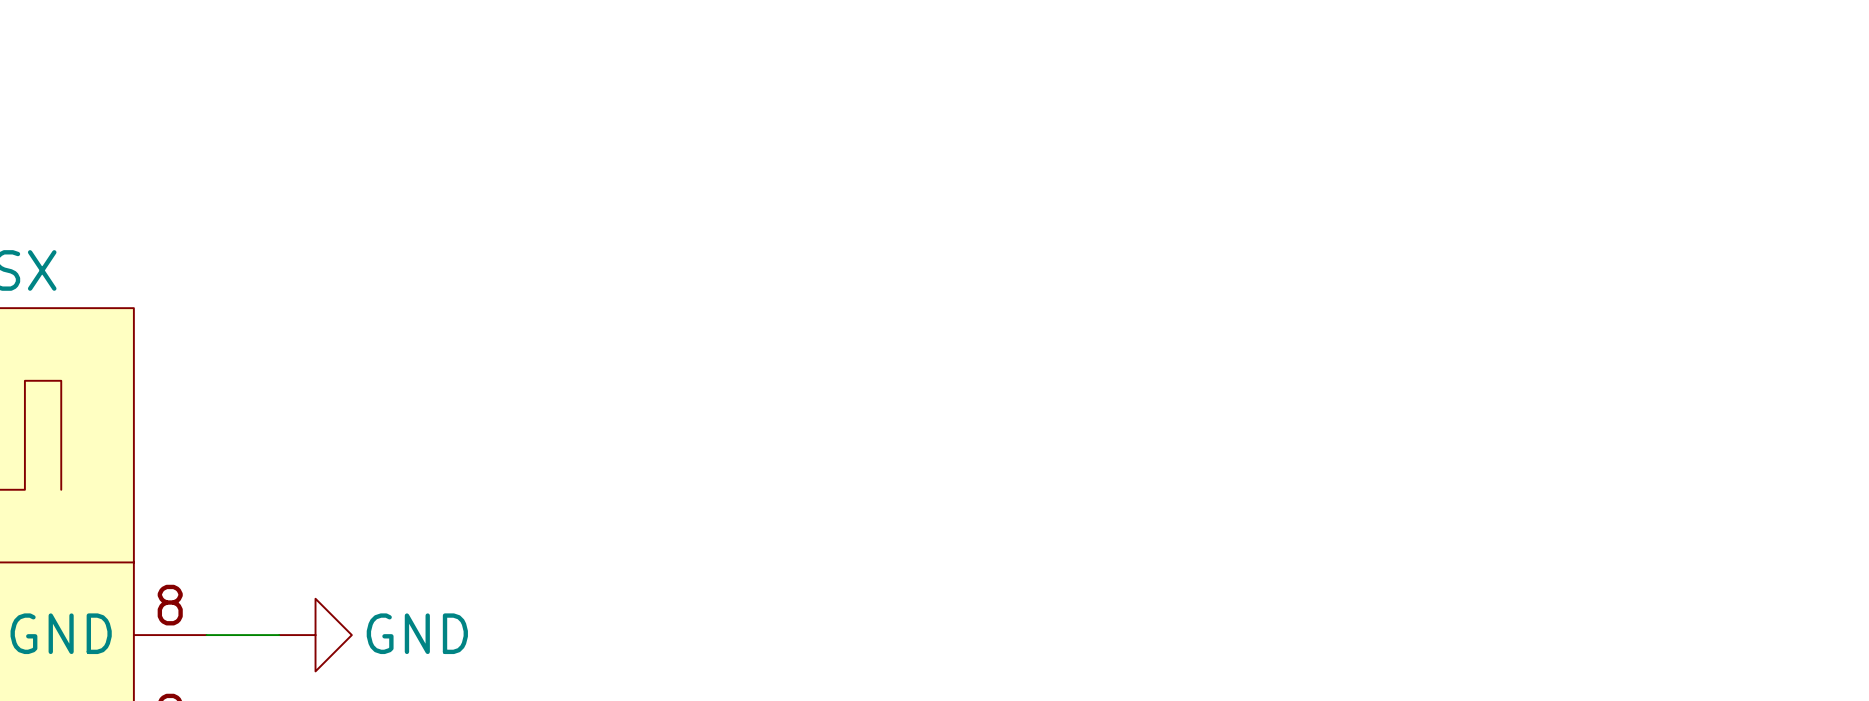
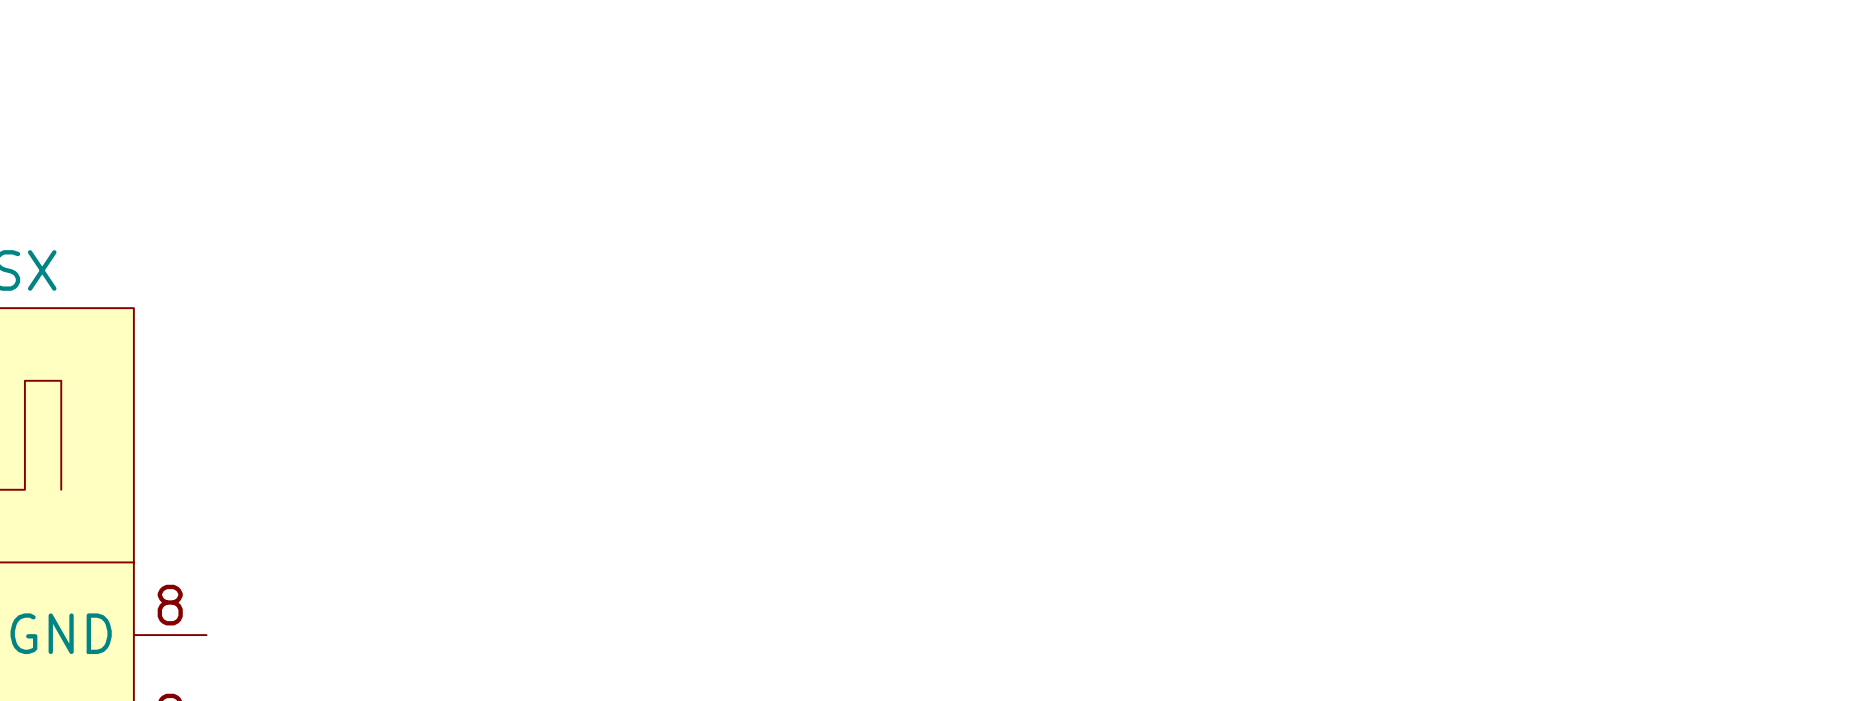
wire: (206, 635) (279, 635) -> none
power symbol: GND (315, 635) -> none

